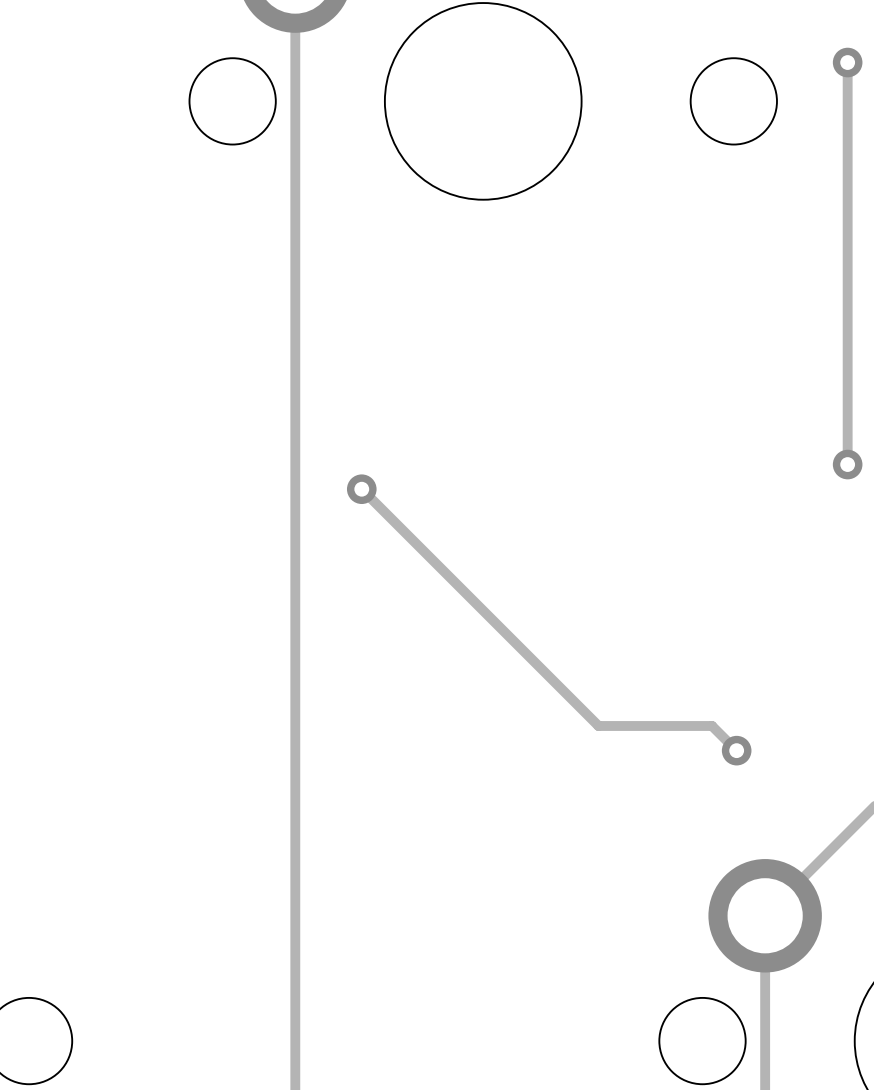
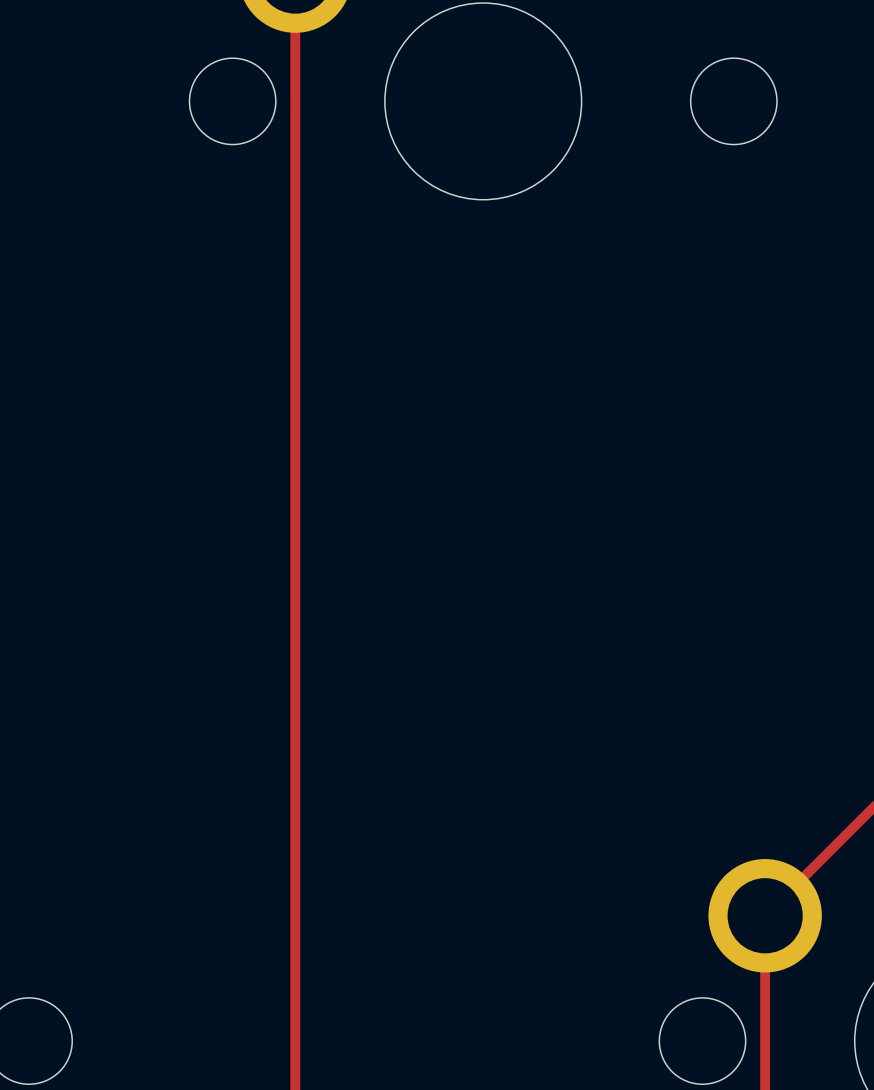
track: (847, 62) (847, 464) -> none
via: (847, 62) -> none
via: (847, 464) -> none
track: (361, 489) (598, 725) (712, 725) (736, 750) -> none
via: (361, 489) -> none
via: (736, 750) -> none

